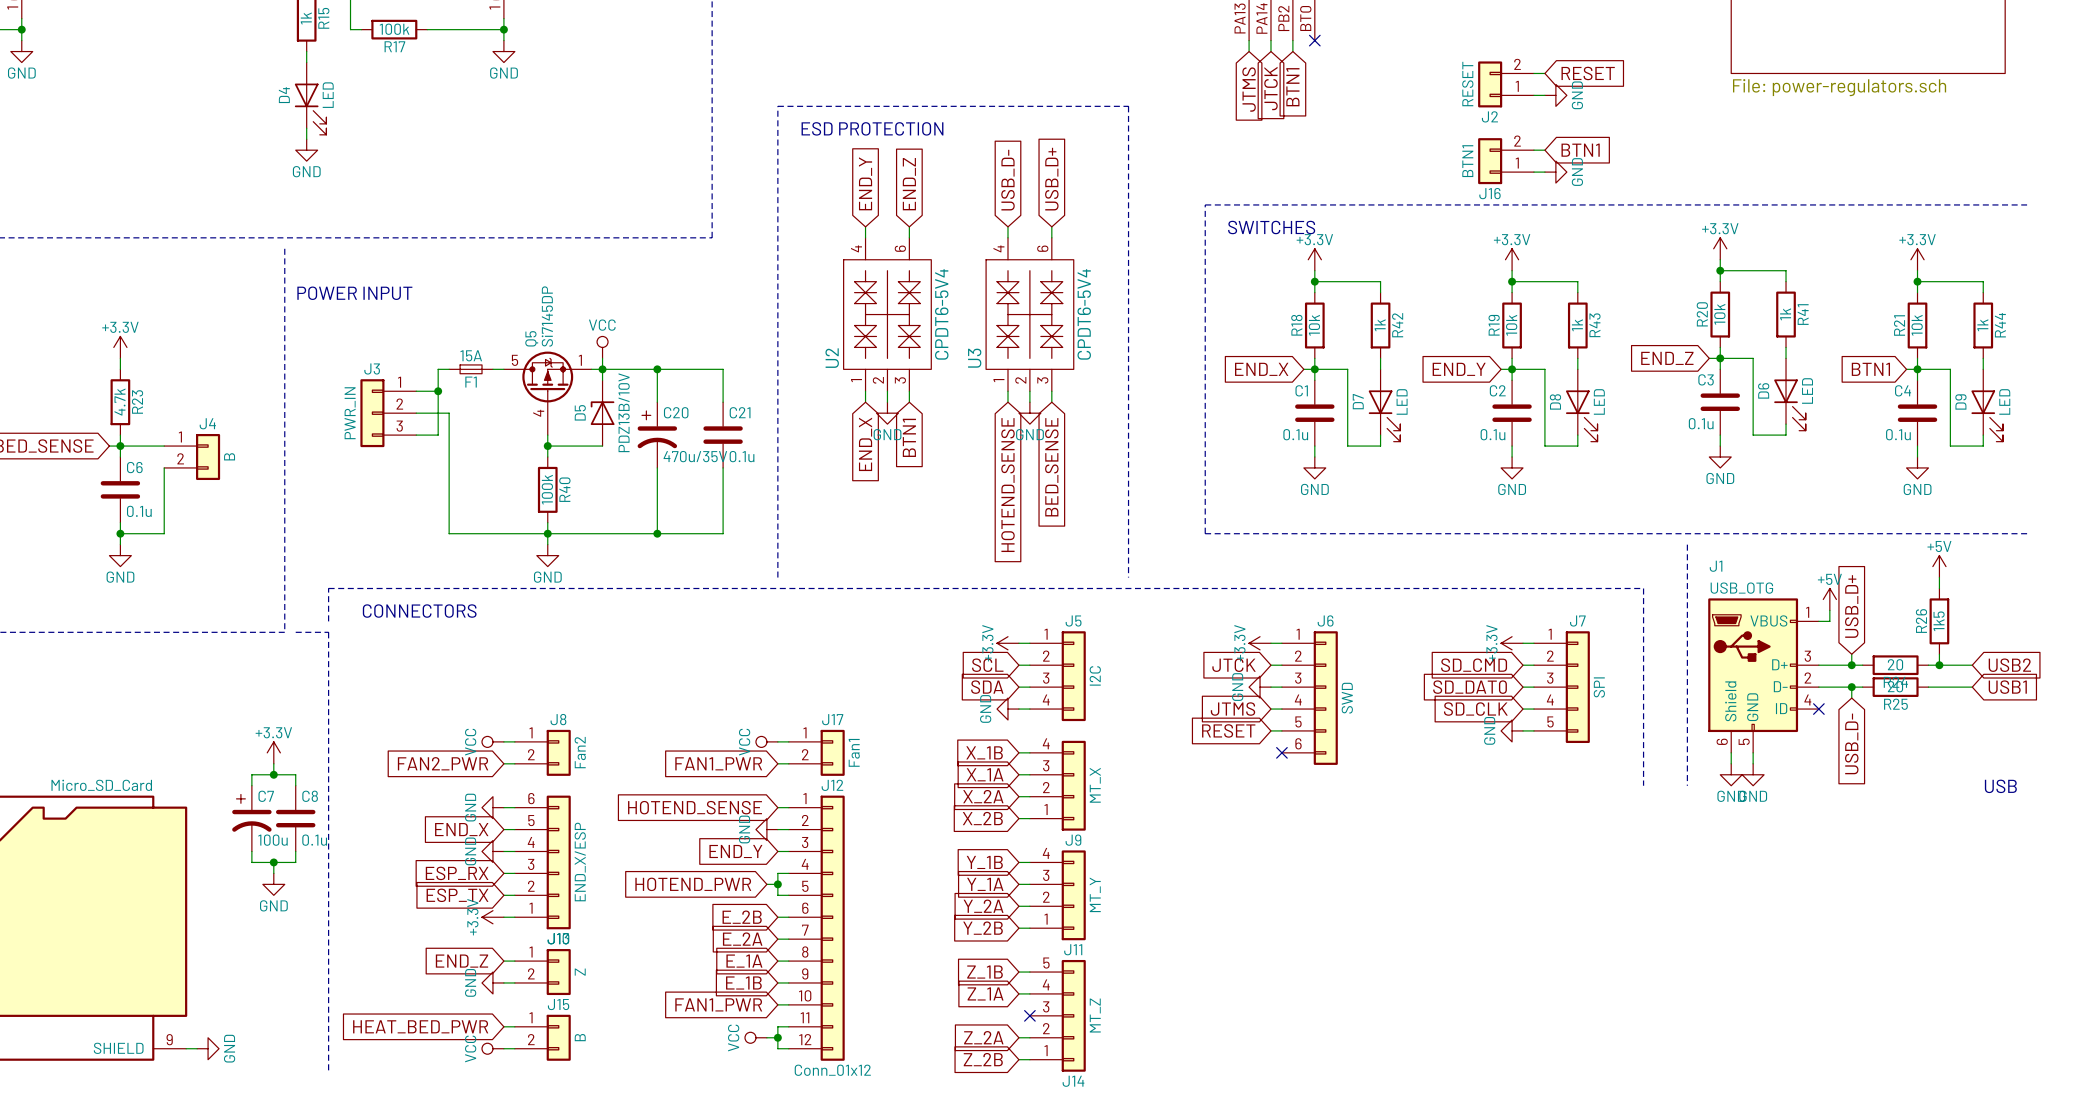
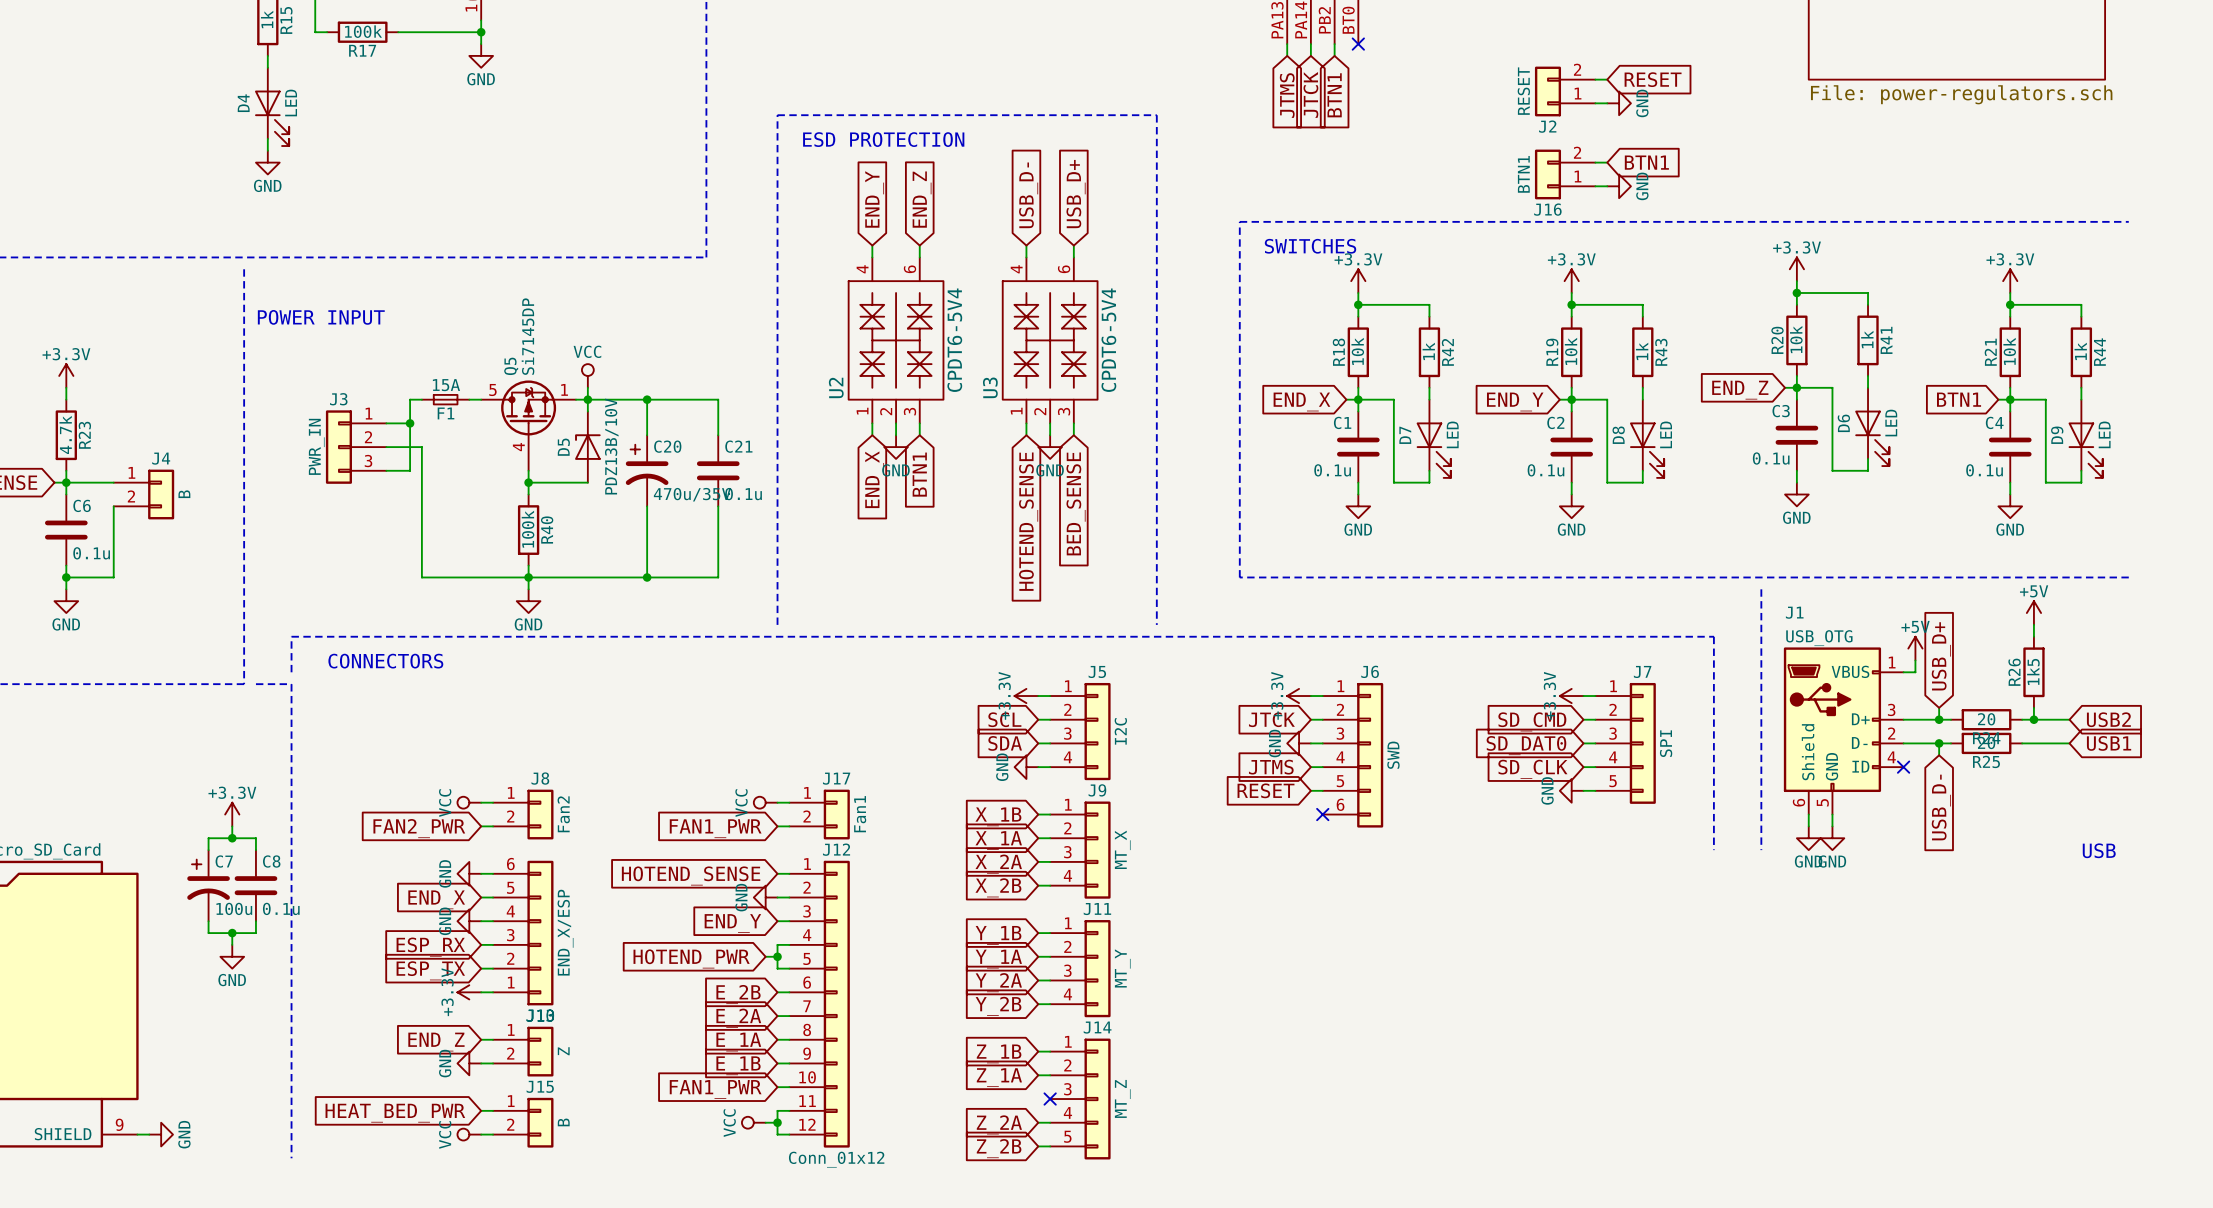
J9 flip: as is (1073, 785) -> up-down (1097, 850)
J11 flip: as is (1073, 895) -> up-down (1097, 968)
J14 flip: as is (1073, 1015) -> up-down (1097, 1099)

